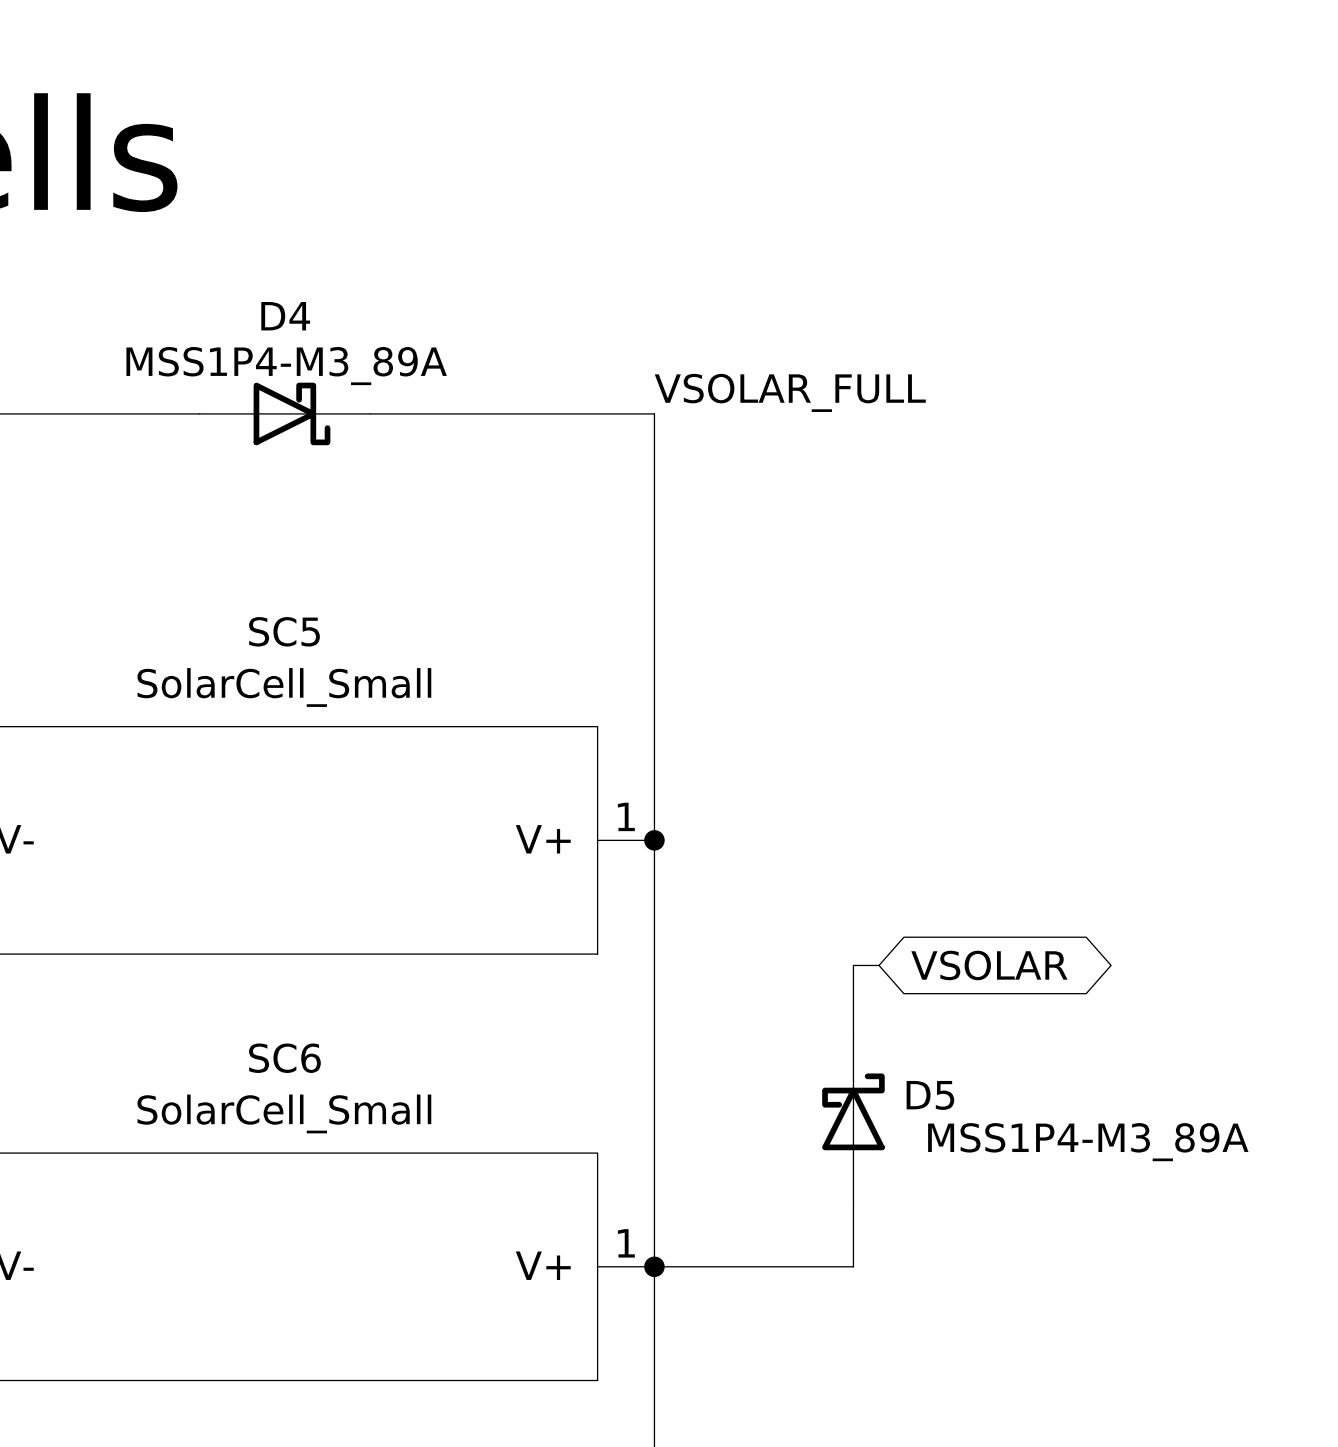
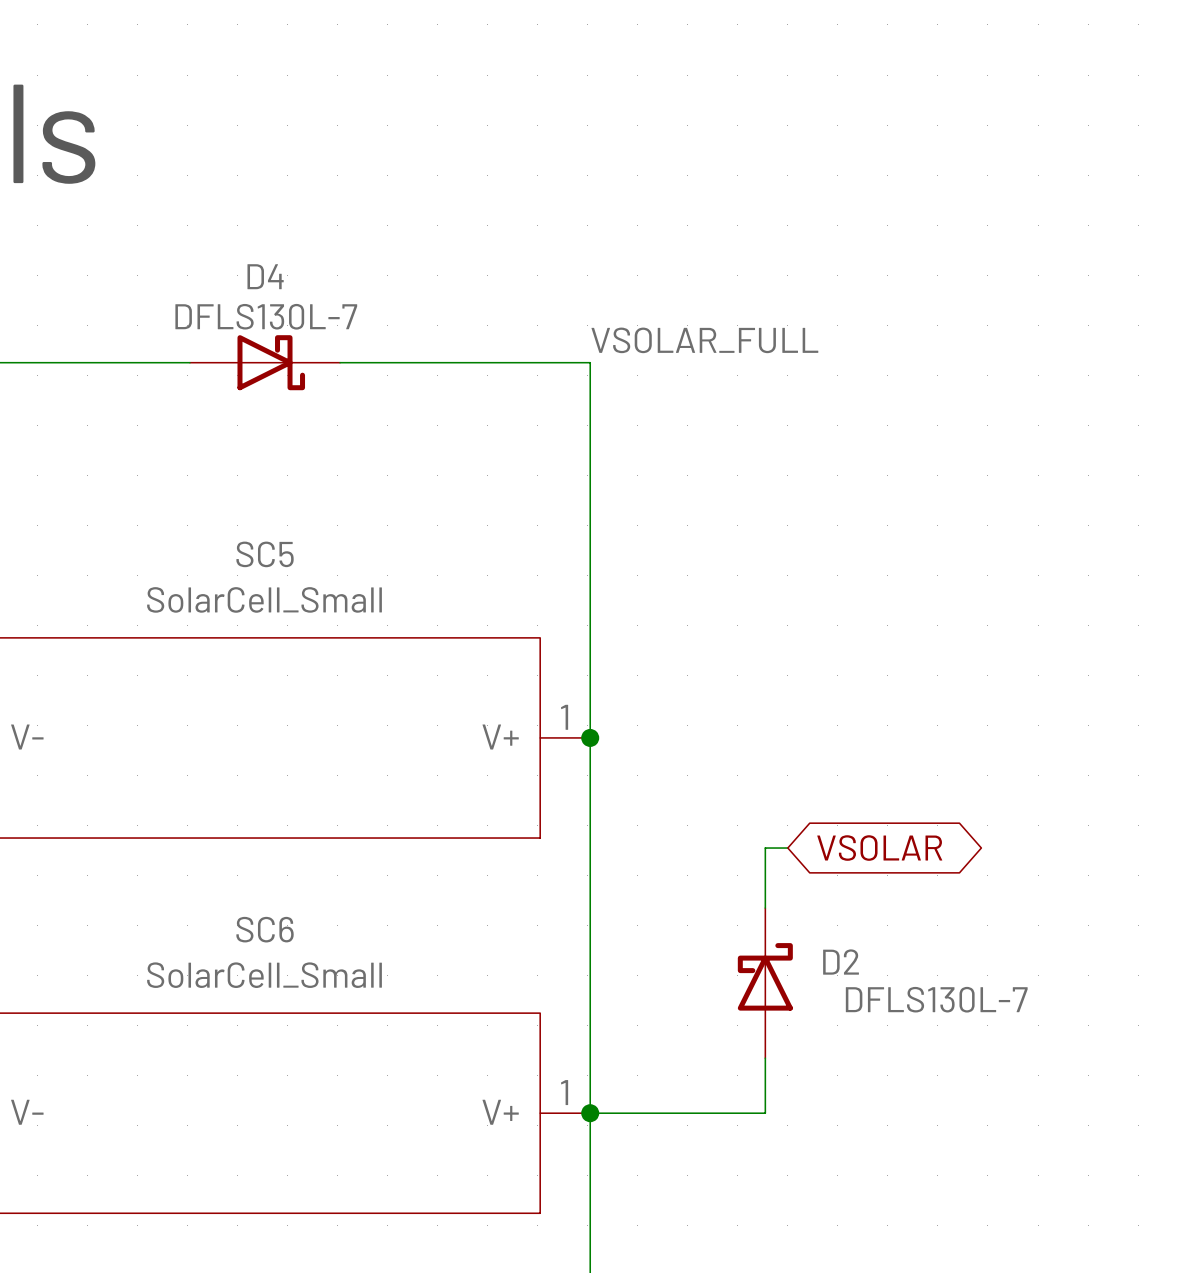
D4 value: MSS1P4-M3_89A (286, 366) -> DFLS130L-7 (266, 316)
D5 name: D5 (930, 1095) -> D2 (841, 962)
D5 value: MSS1P4-M3_89A (1088, 1142) -> DFLS130L-7 (936, 999)

